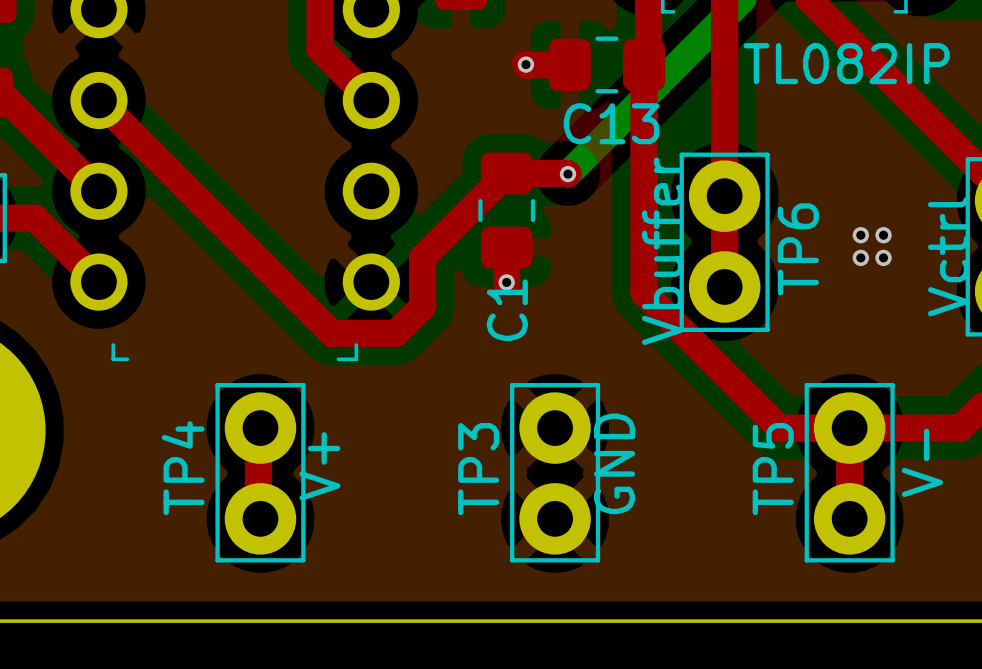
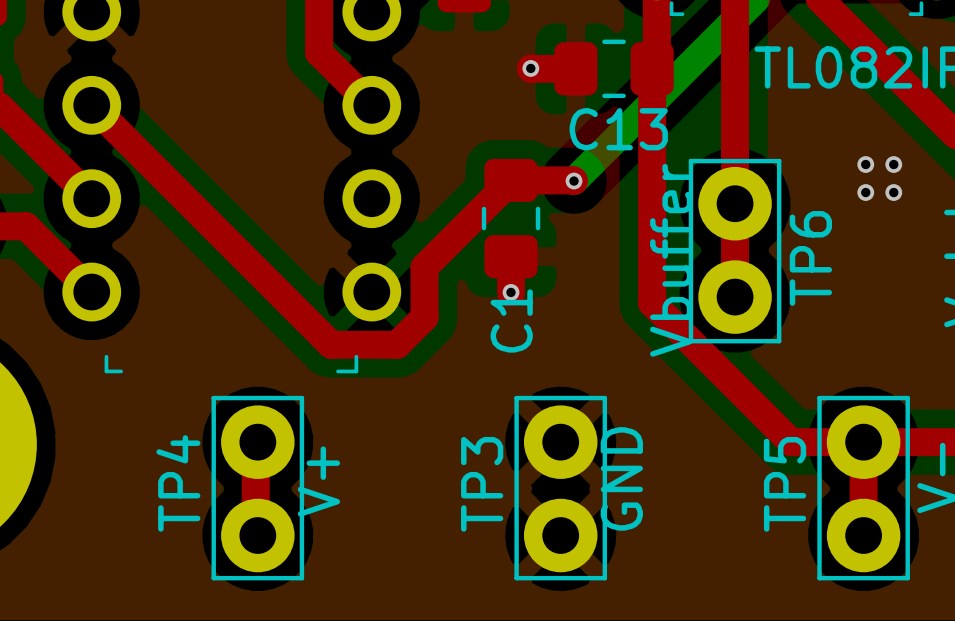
via: none -> (865, 164)
via: none -> (893, 164)
via: none -> (865, 192)
via: none -> (893, 192)
via: (860, 235) -> none
via: (883, 235) -> none
via: (860, 257) -> none
via: (883, 257) -> none

